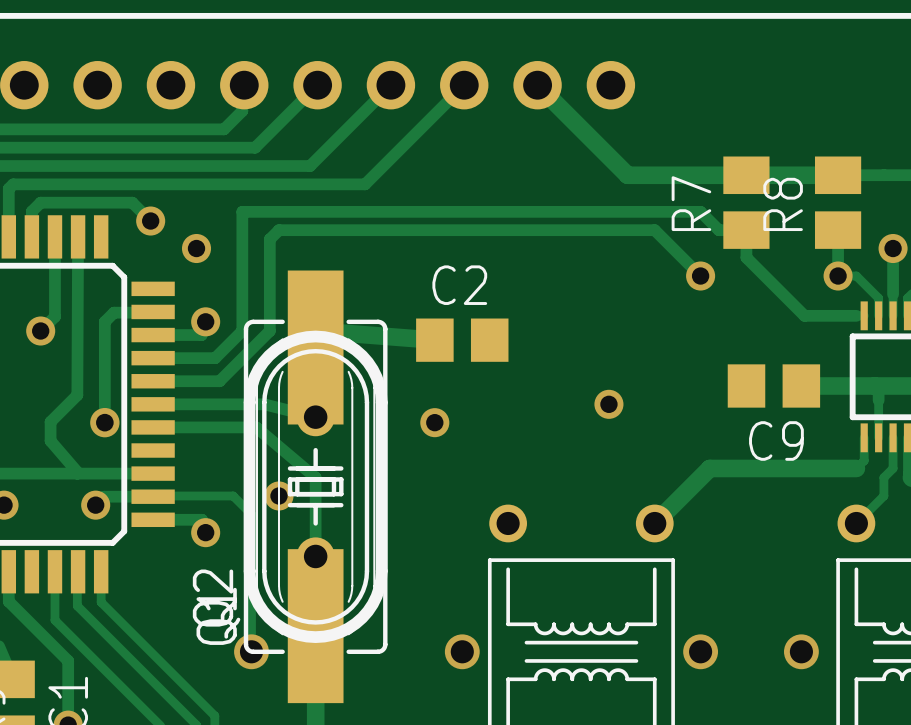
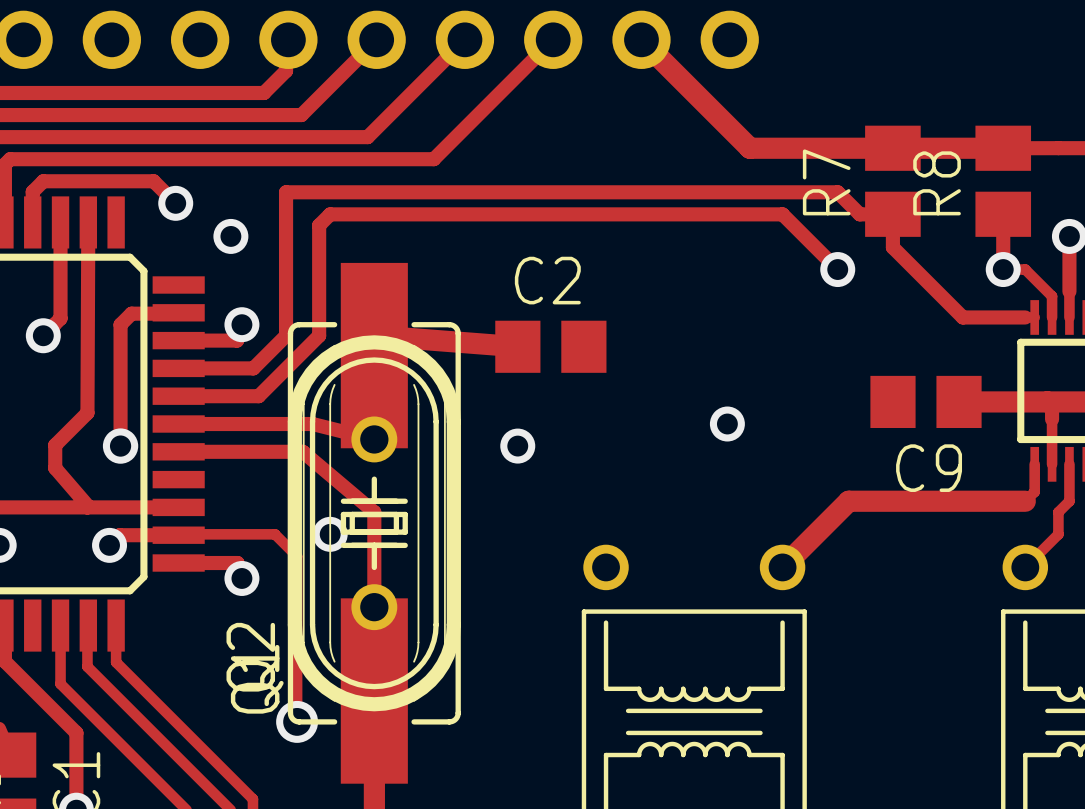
via: (462, 651) -> none
via: (700, 651) -> none
via: (801, 651) -> none

